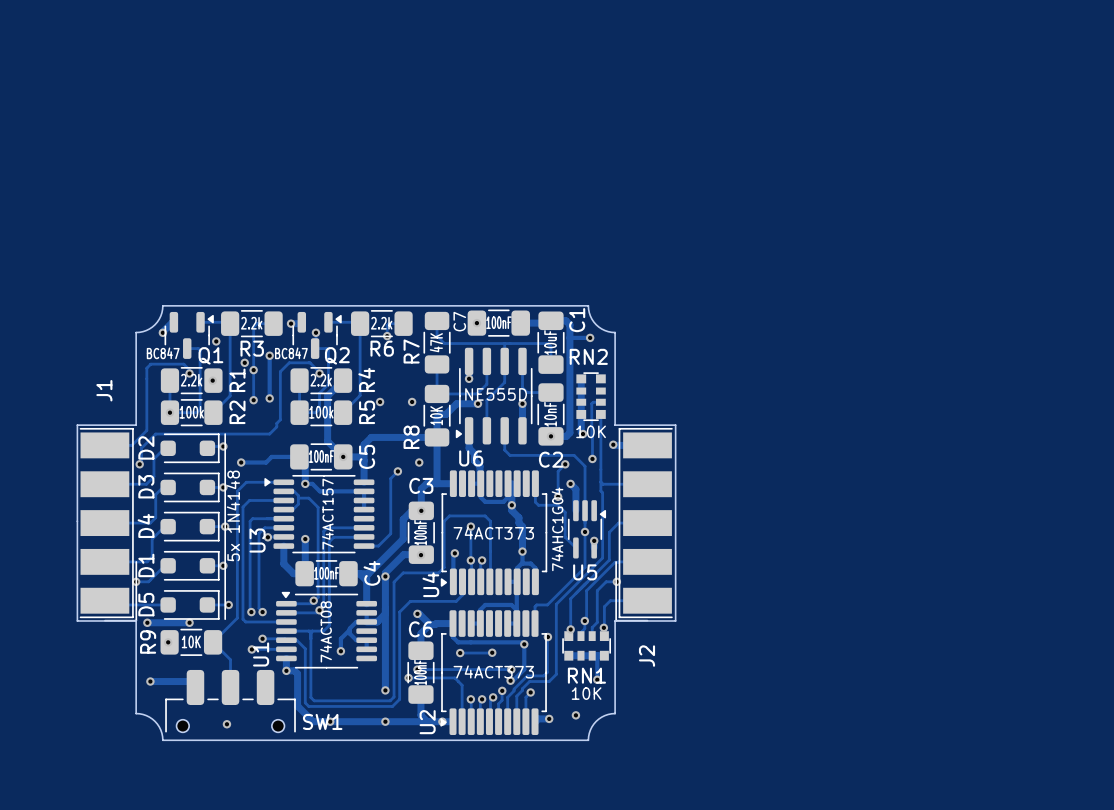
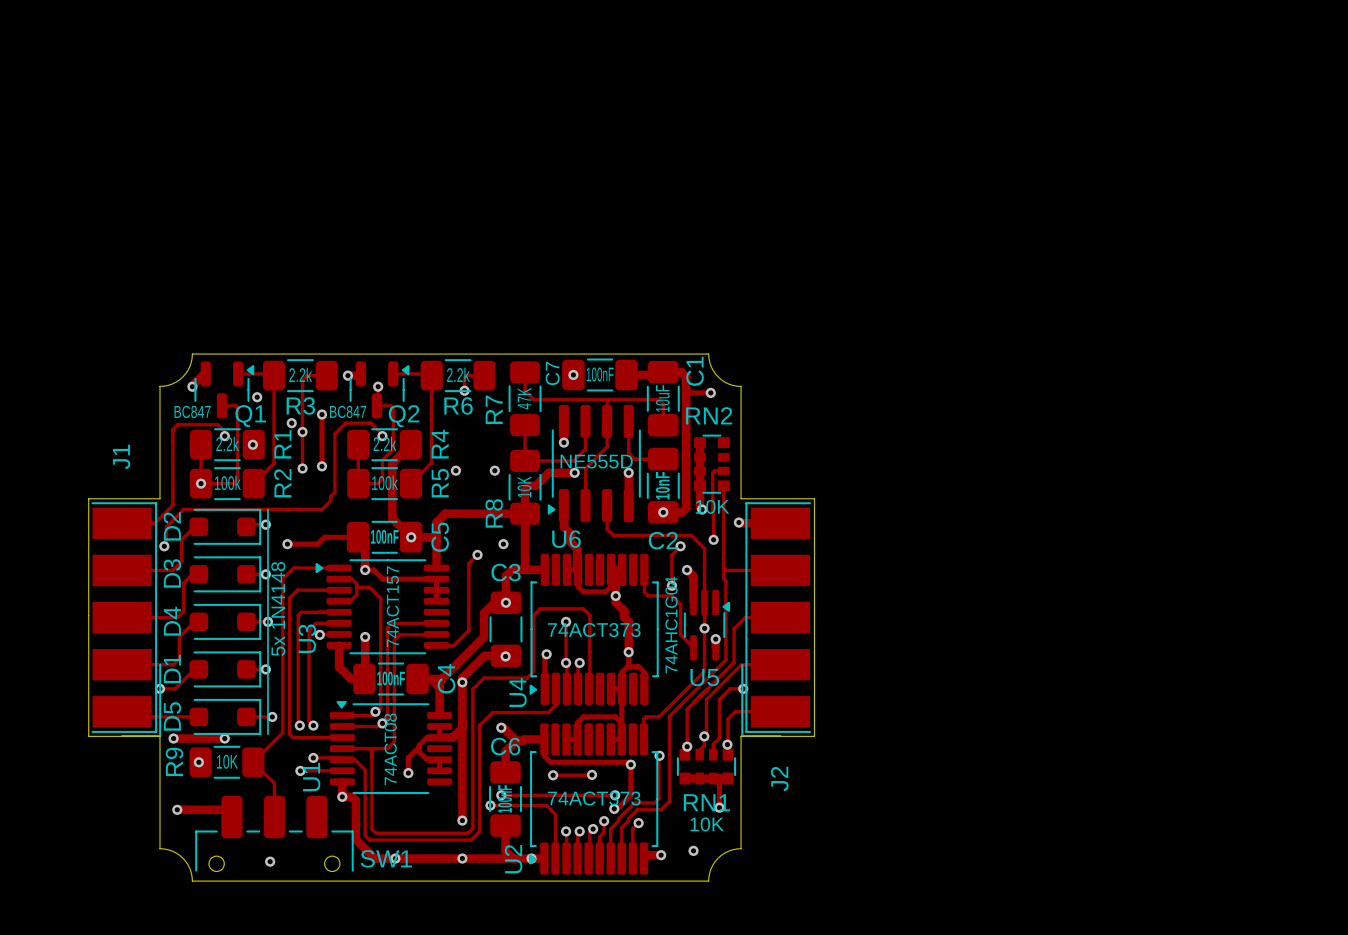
C3 value: 100nF (420, 532) -> none

